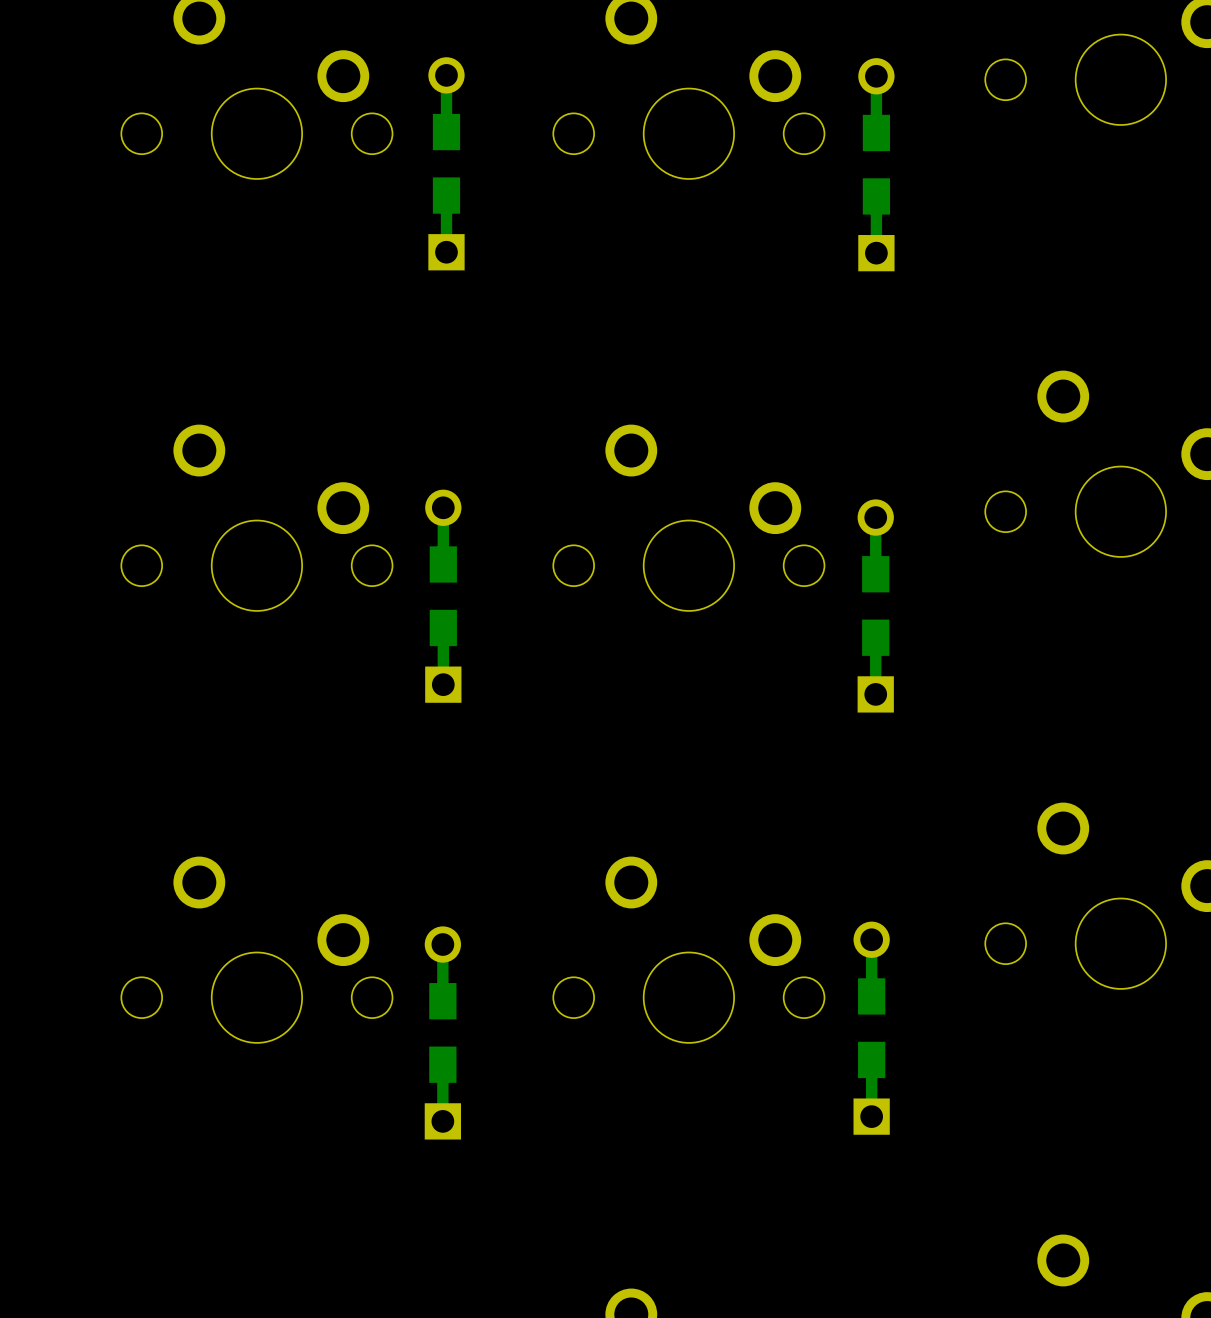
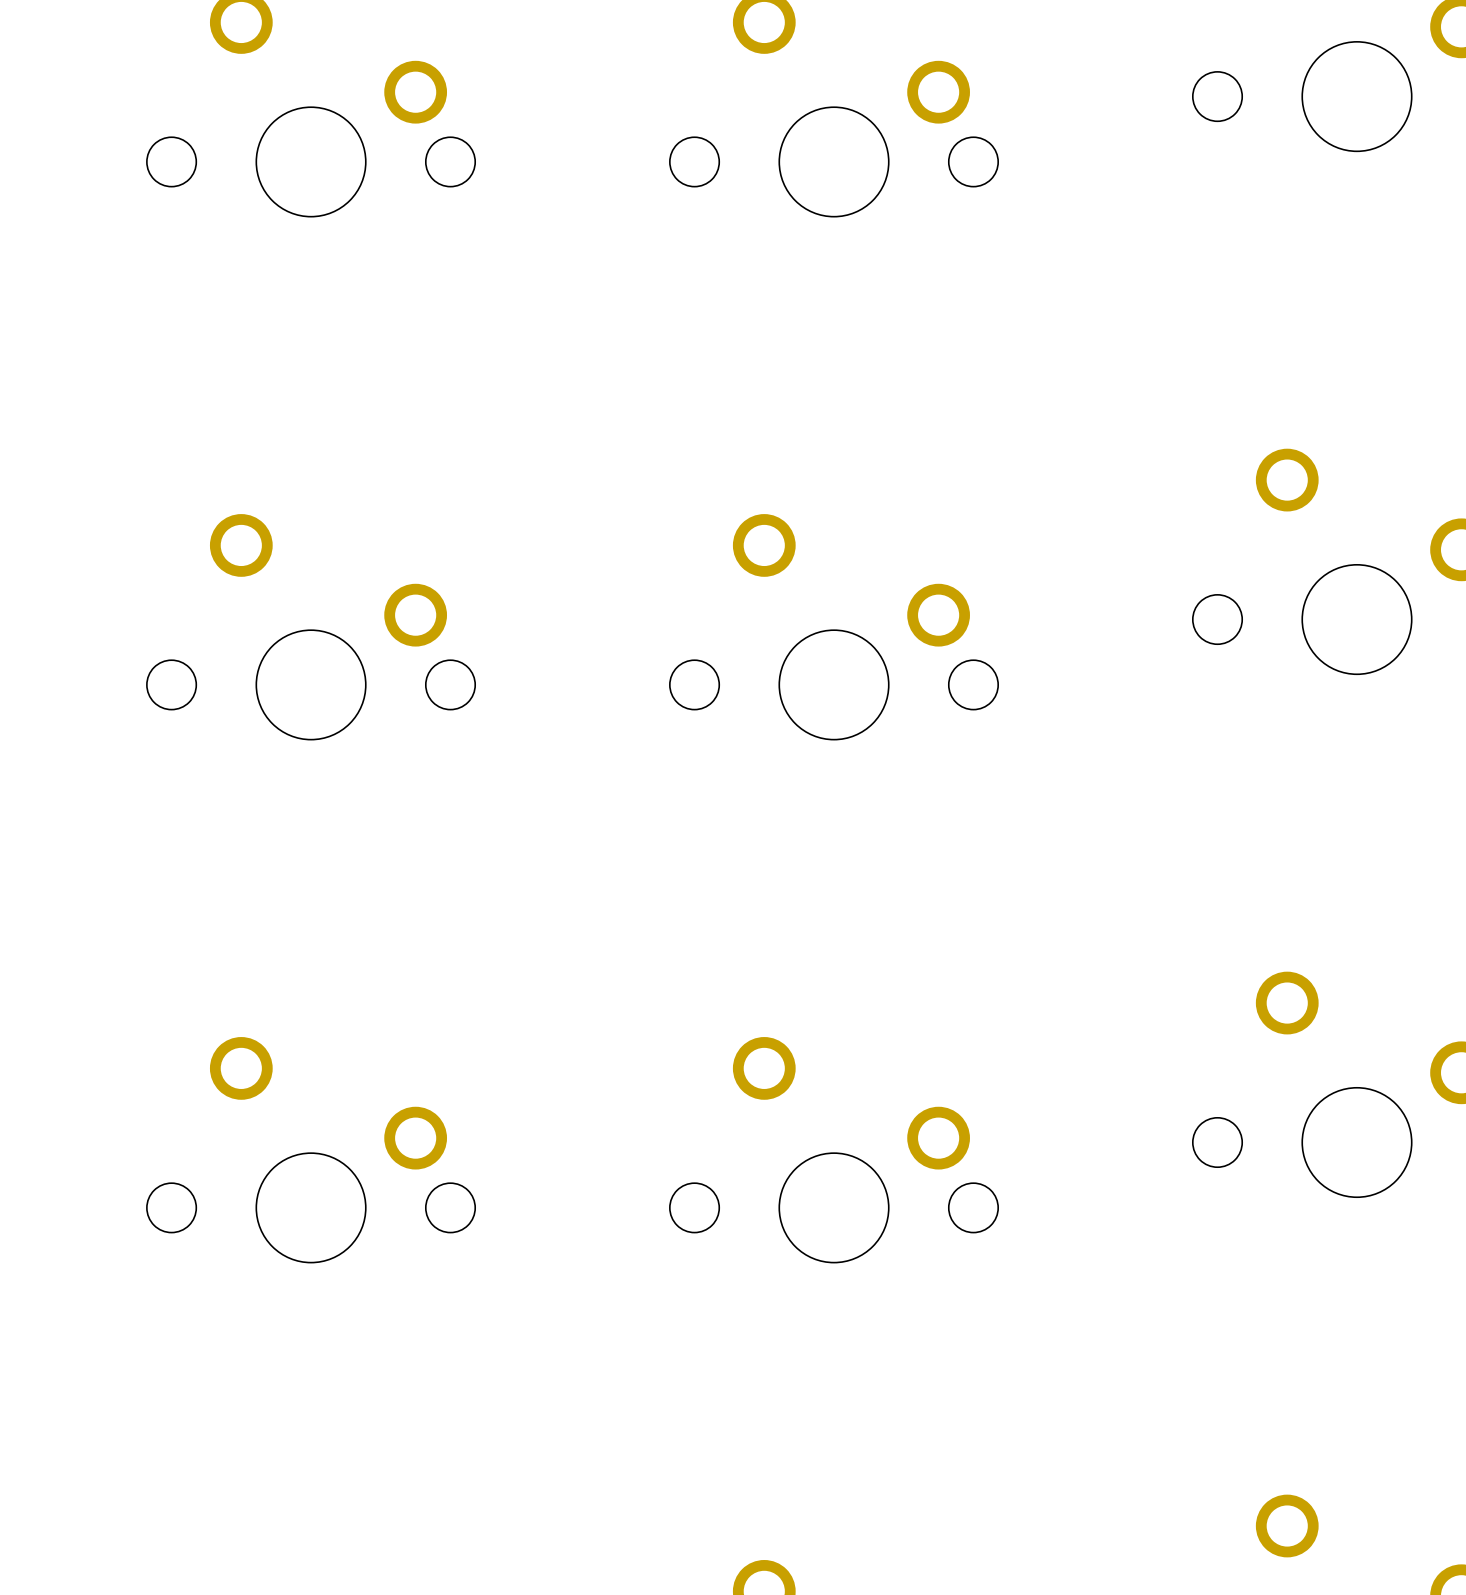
part: (446, 163) -> none
part: (876, 164) -> none
part: (443, 596) -> none
part: (875, 605) -> none
part: (871, 1028) -> none
part: (442, 1032) -> none

